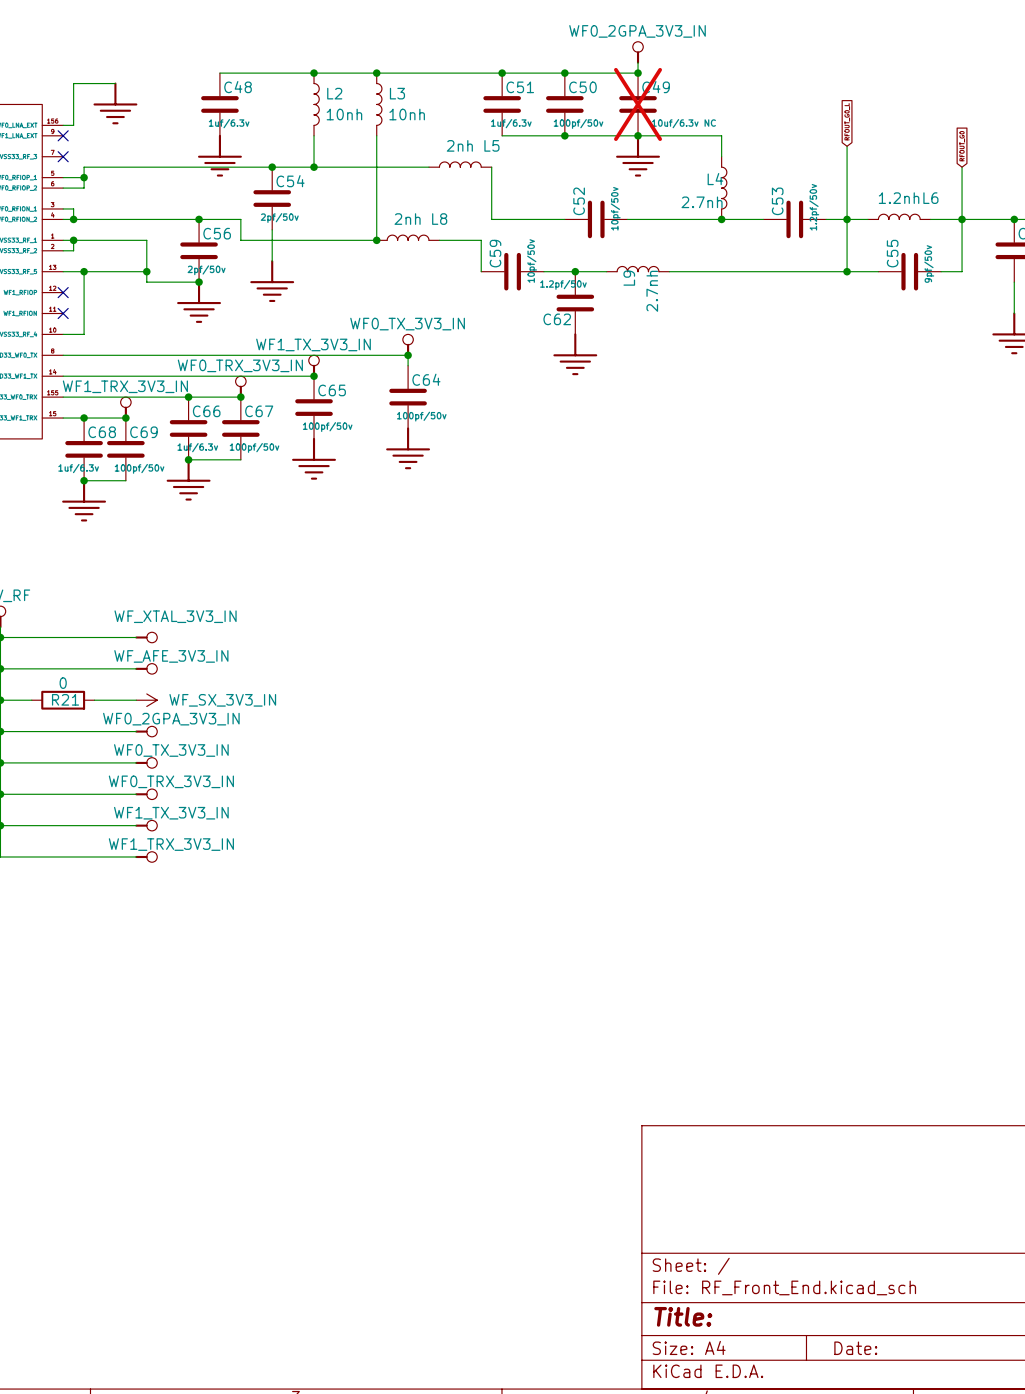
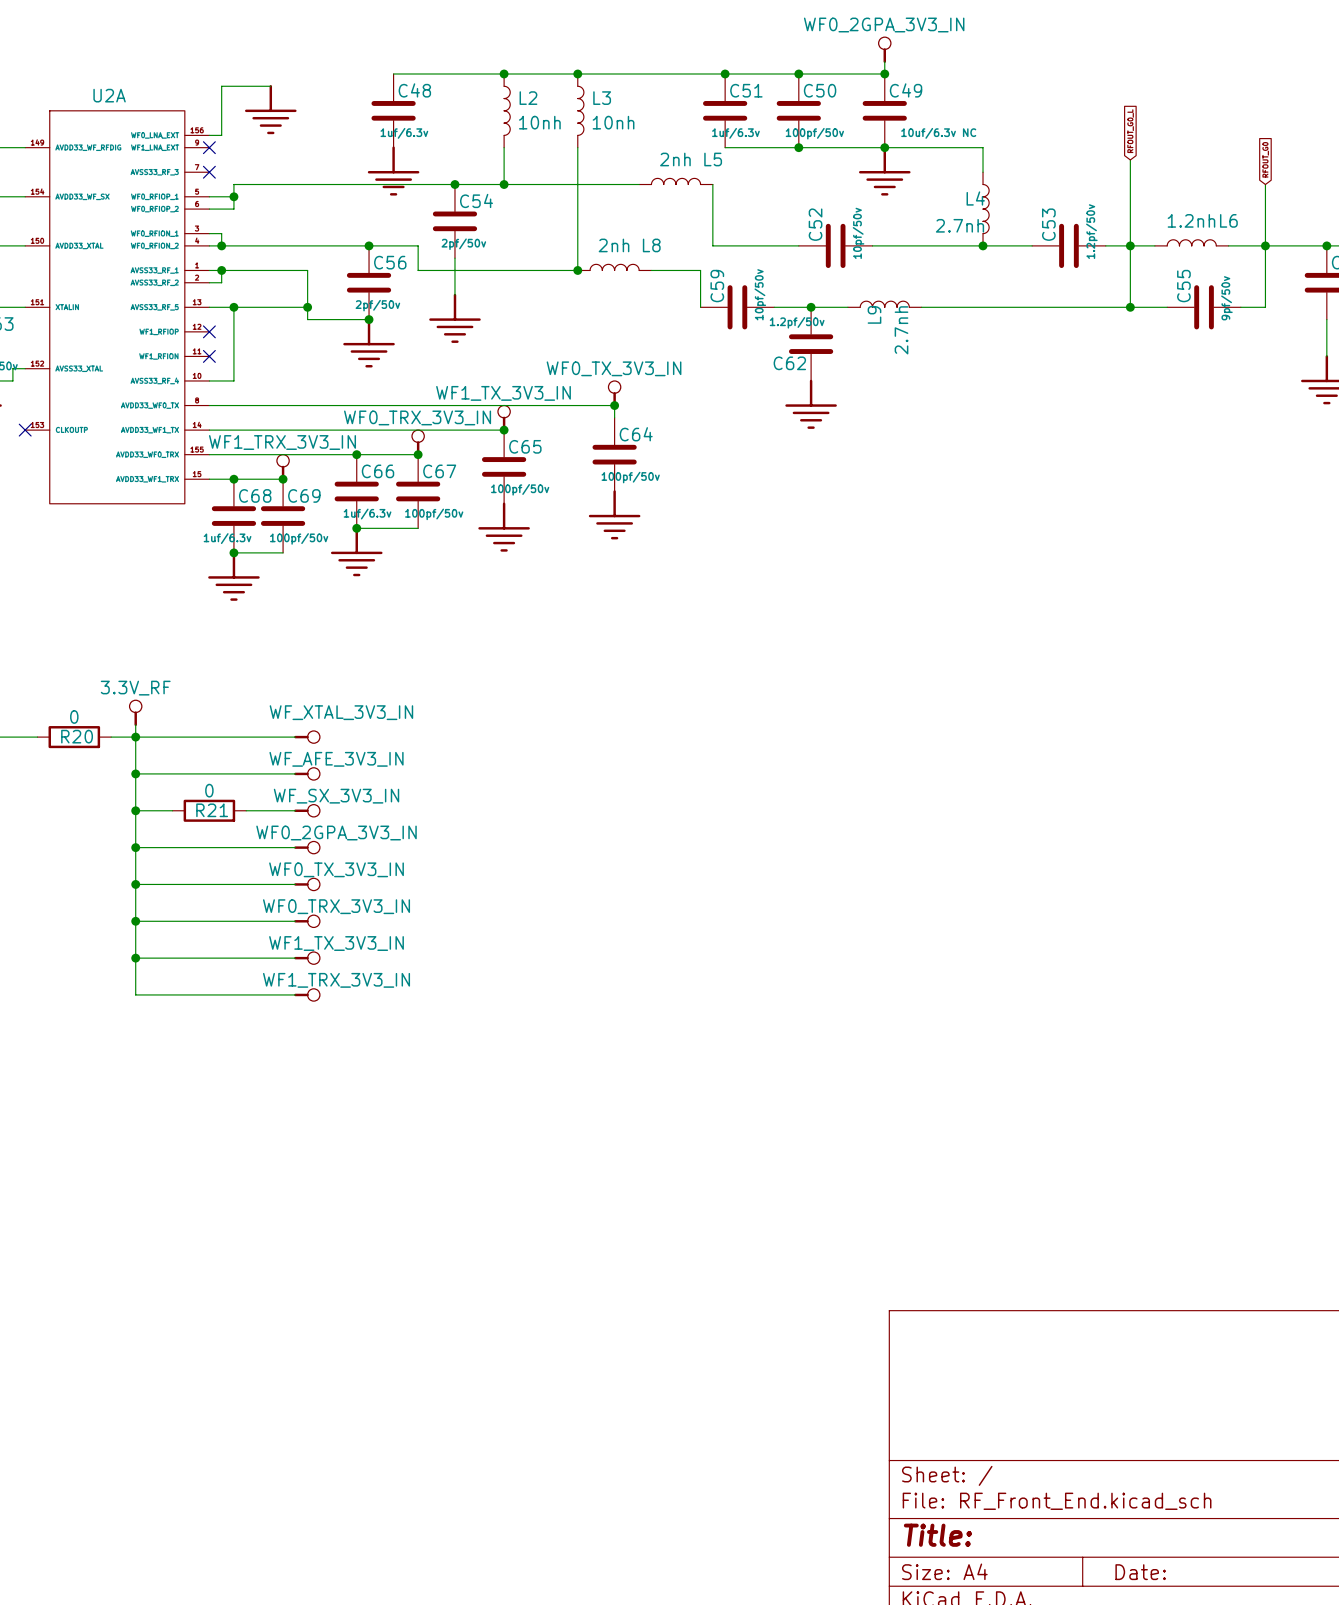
C49 do-not-place cross: (638, 104) -> none
power symbol shape: [136, 693, 158, 707] -> [294, 804, 321, 818]
power symbol text position: WF_SX_3V3_IN (222, 700) -> WF_SX_3V3_IN (336, 796)

